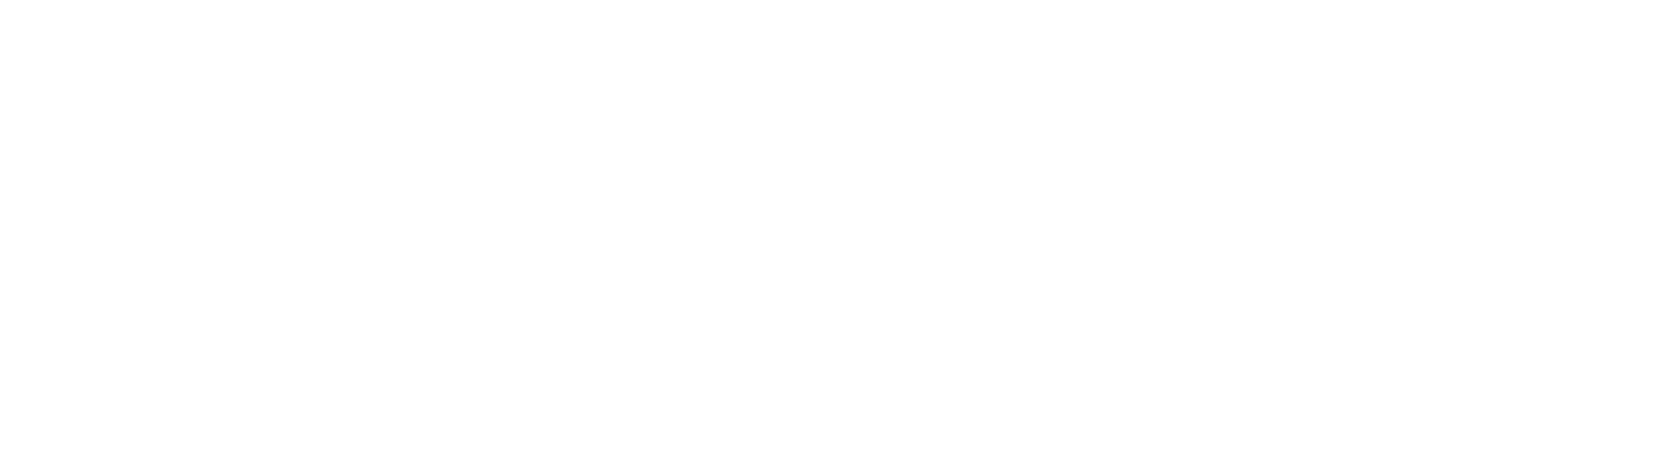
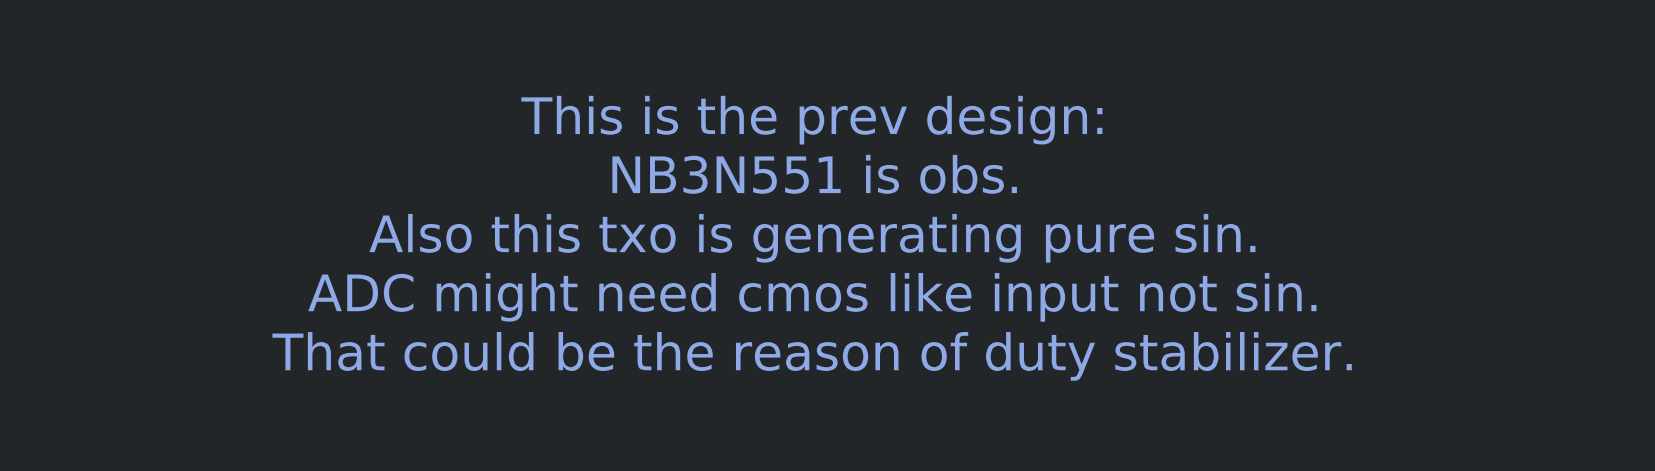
text: none -> This is the prev design: (811, 120)
text: none -> NB3N551 is obs. (814, 174)
text: none -> Also this txo is generating pure sin. (812, 238)
text: none -> ADC might need cmos like input not sin. (812, 297)
text: none -> That could be the reason of duty stabilizer. (812, 356)

